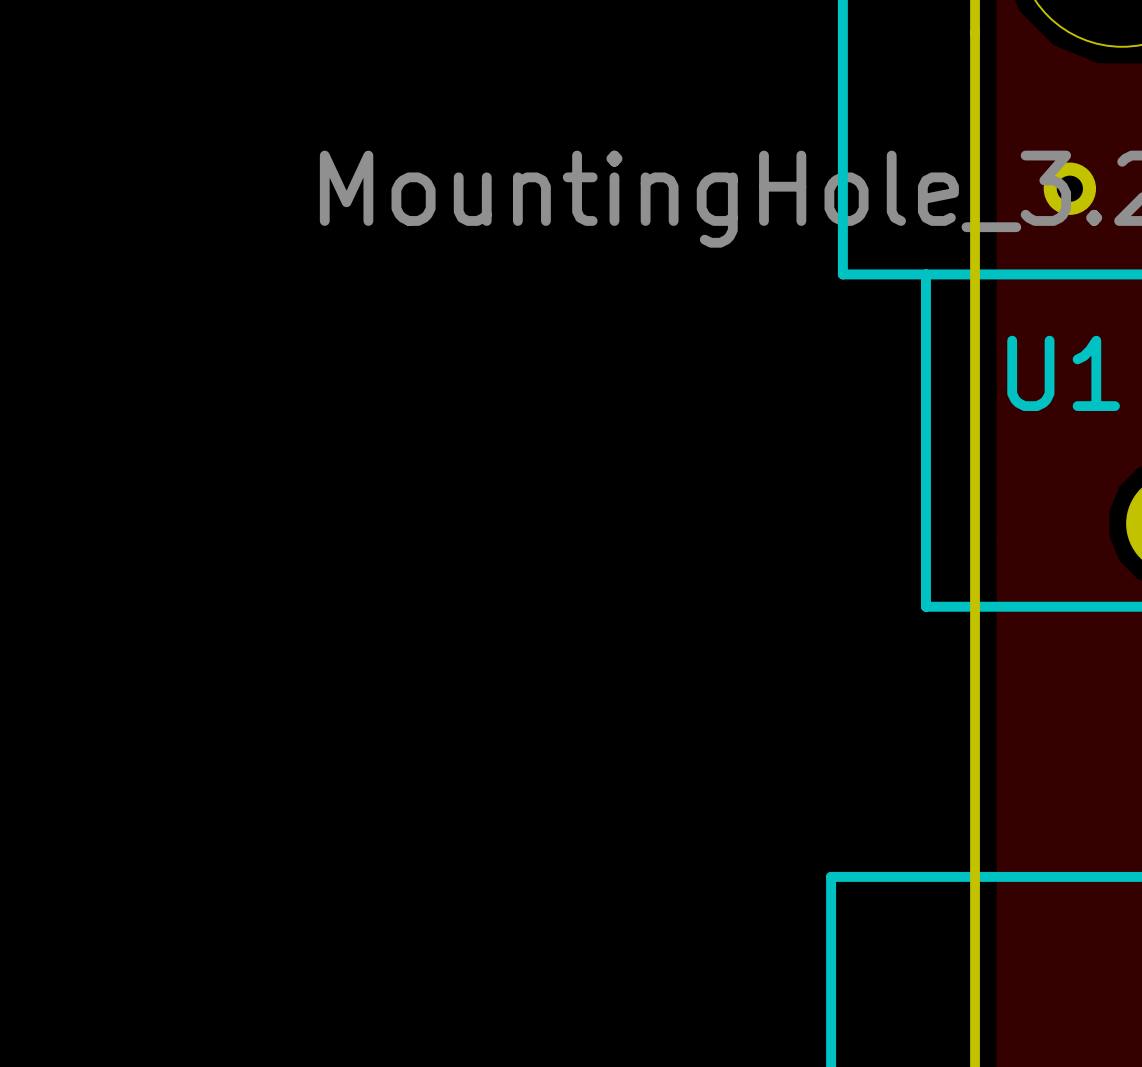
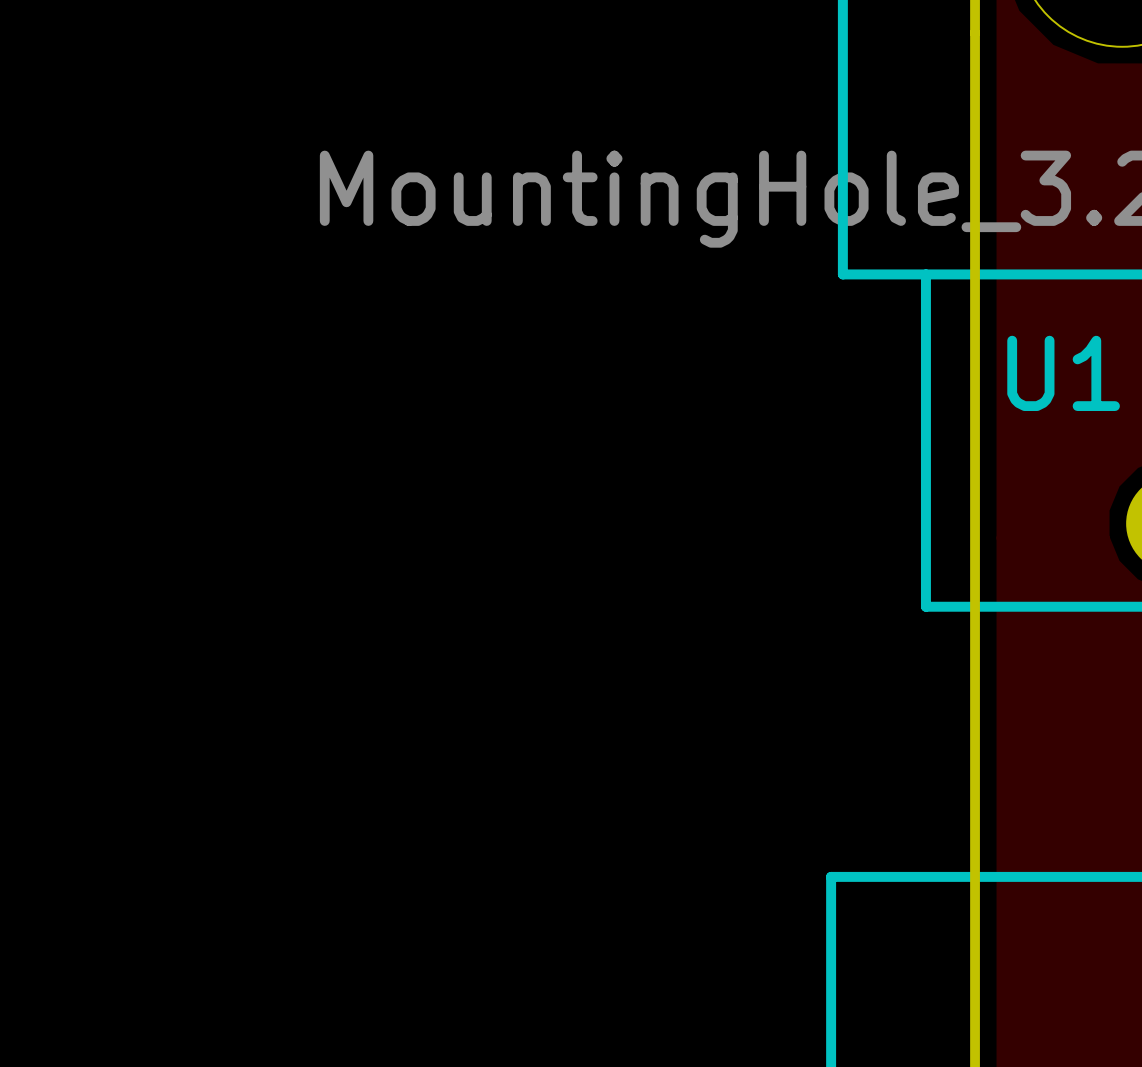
part: (1069, 188) -> none

